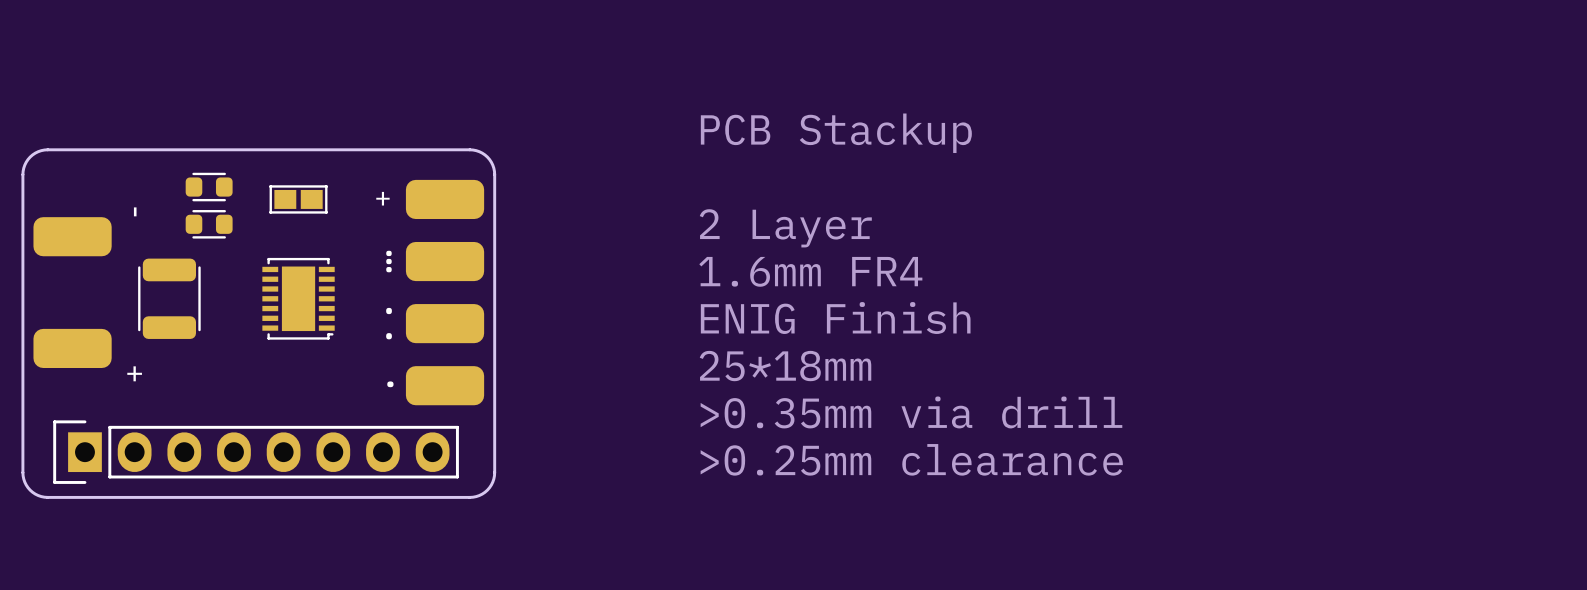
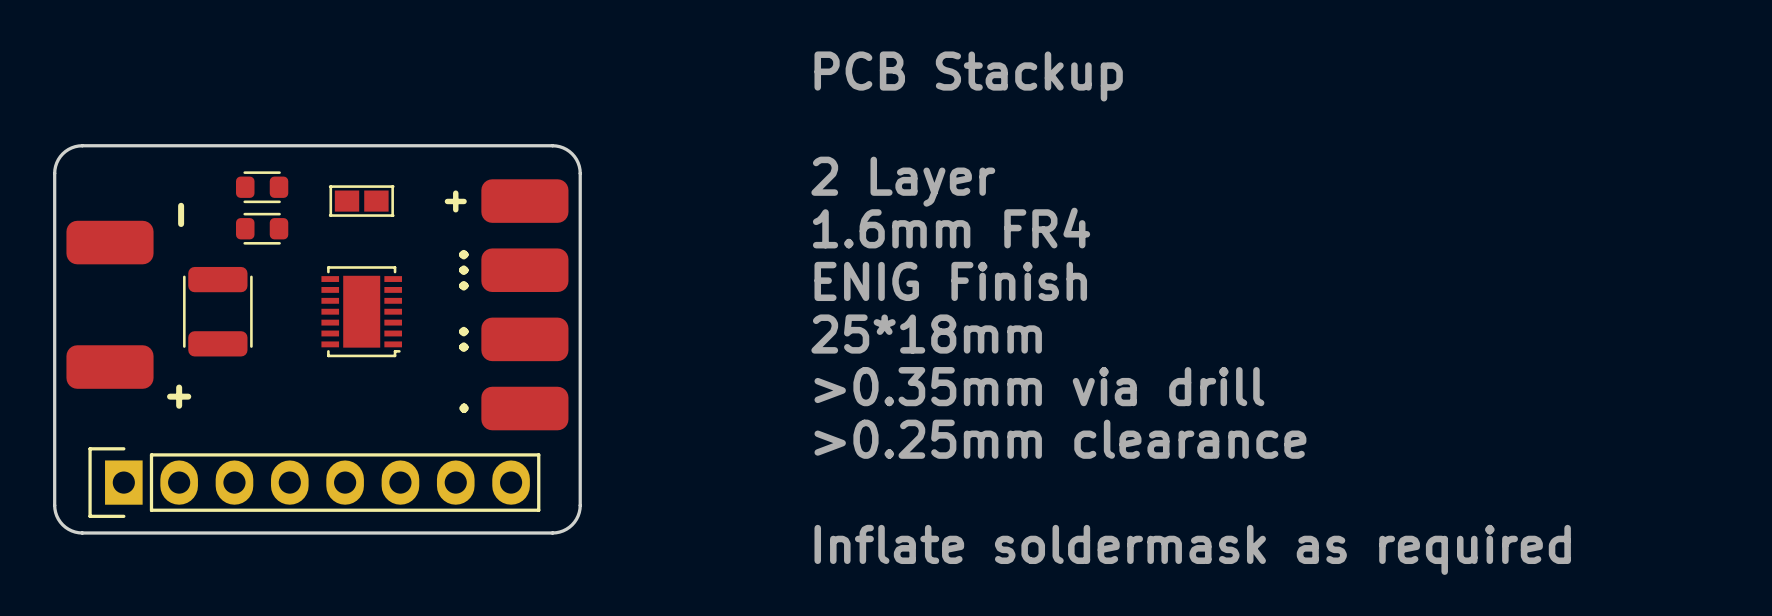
text position: PCB Stackup (836, 133) -> PCB Stackup (968, 76)
text: none -> 2 Layer (903, 181)
text: 2 Layer (785, 228) -> 1.6mm FR4 (951, 228)
text: 1.6mm FR4 (810, 271) -> ENIG Finish (950, 281)
text: ENIG Finish (835, 318) -> 25*18mm (926, 334)
text: 25*18mm (785, 366) -> >0.35mm via drill (1039, 386)
text: >0.35mm via drill (911, 412) -> >0.25mm clearance (1060, 439)
text: >0.25mm clearance (911, 459) -> none
text: none -> Inflate soldermask as required (1192, 549)

